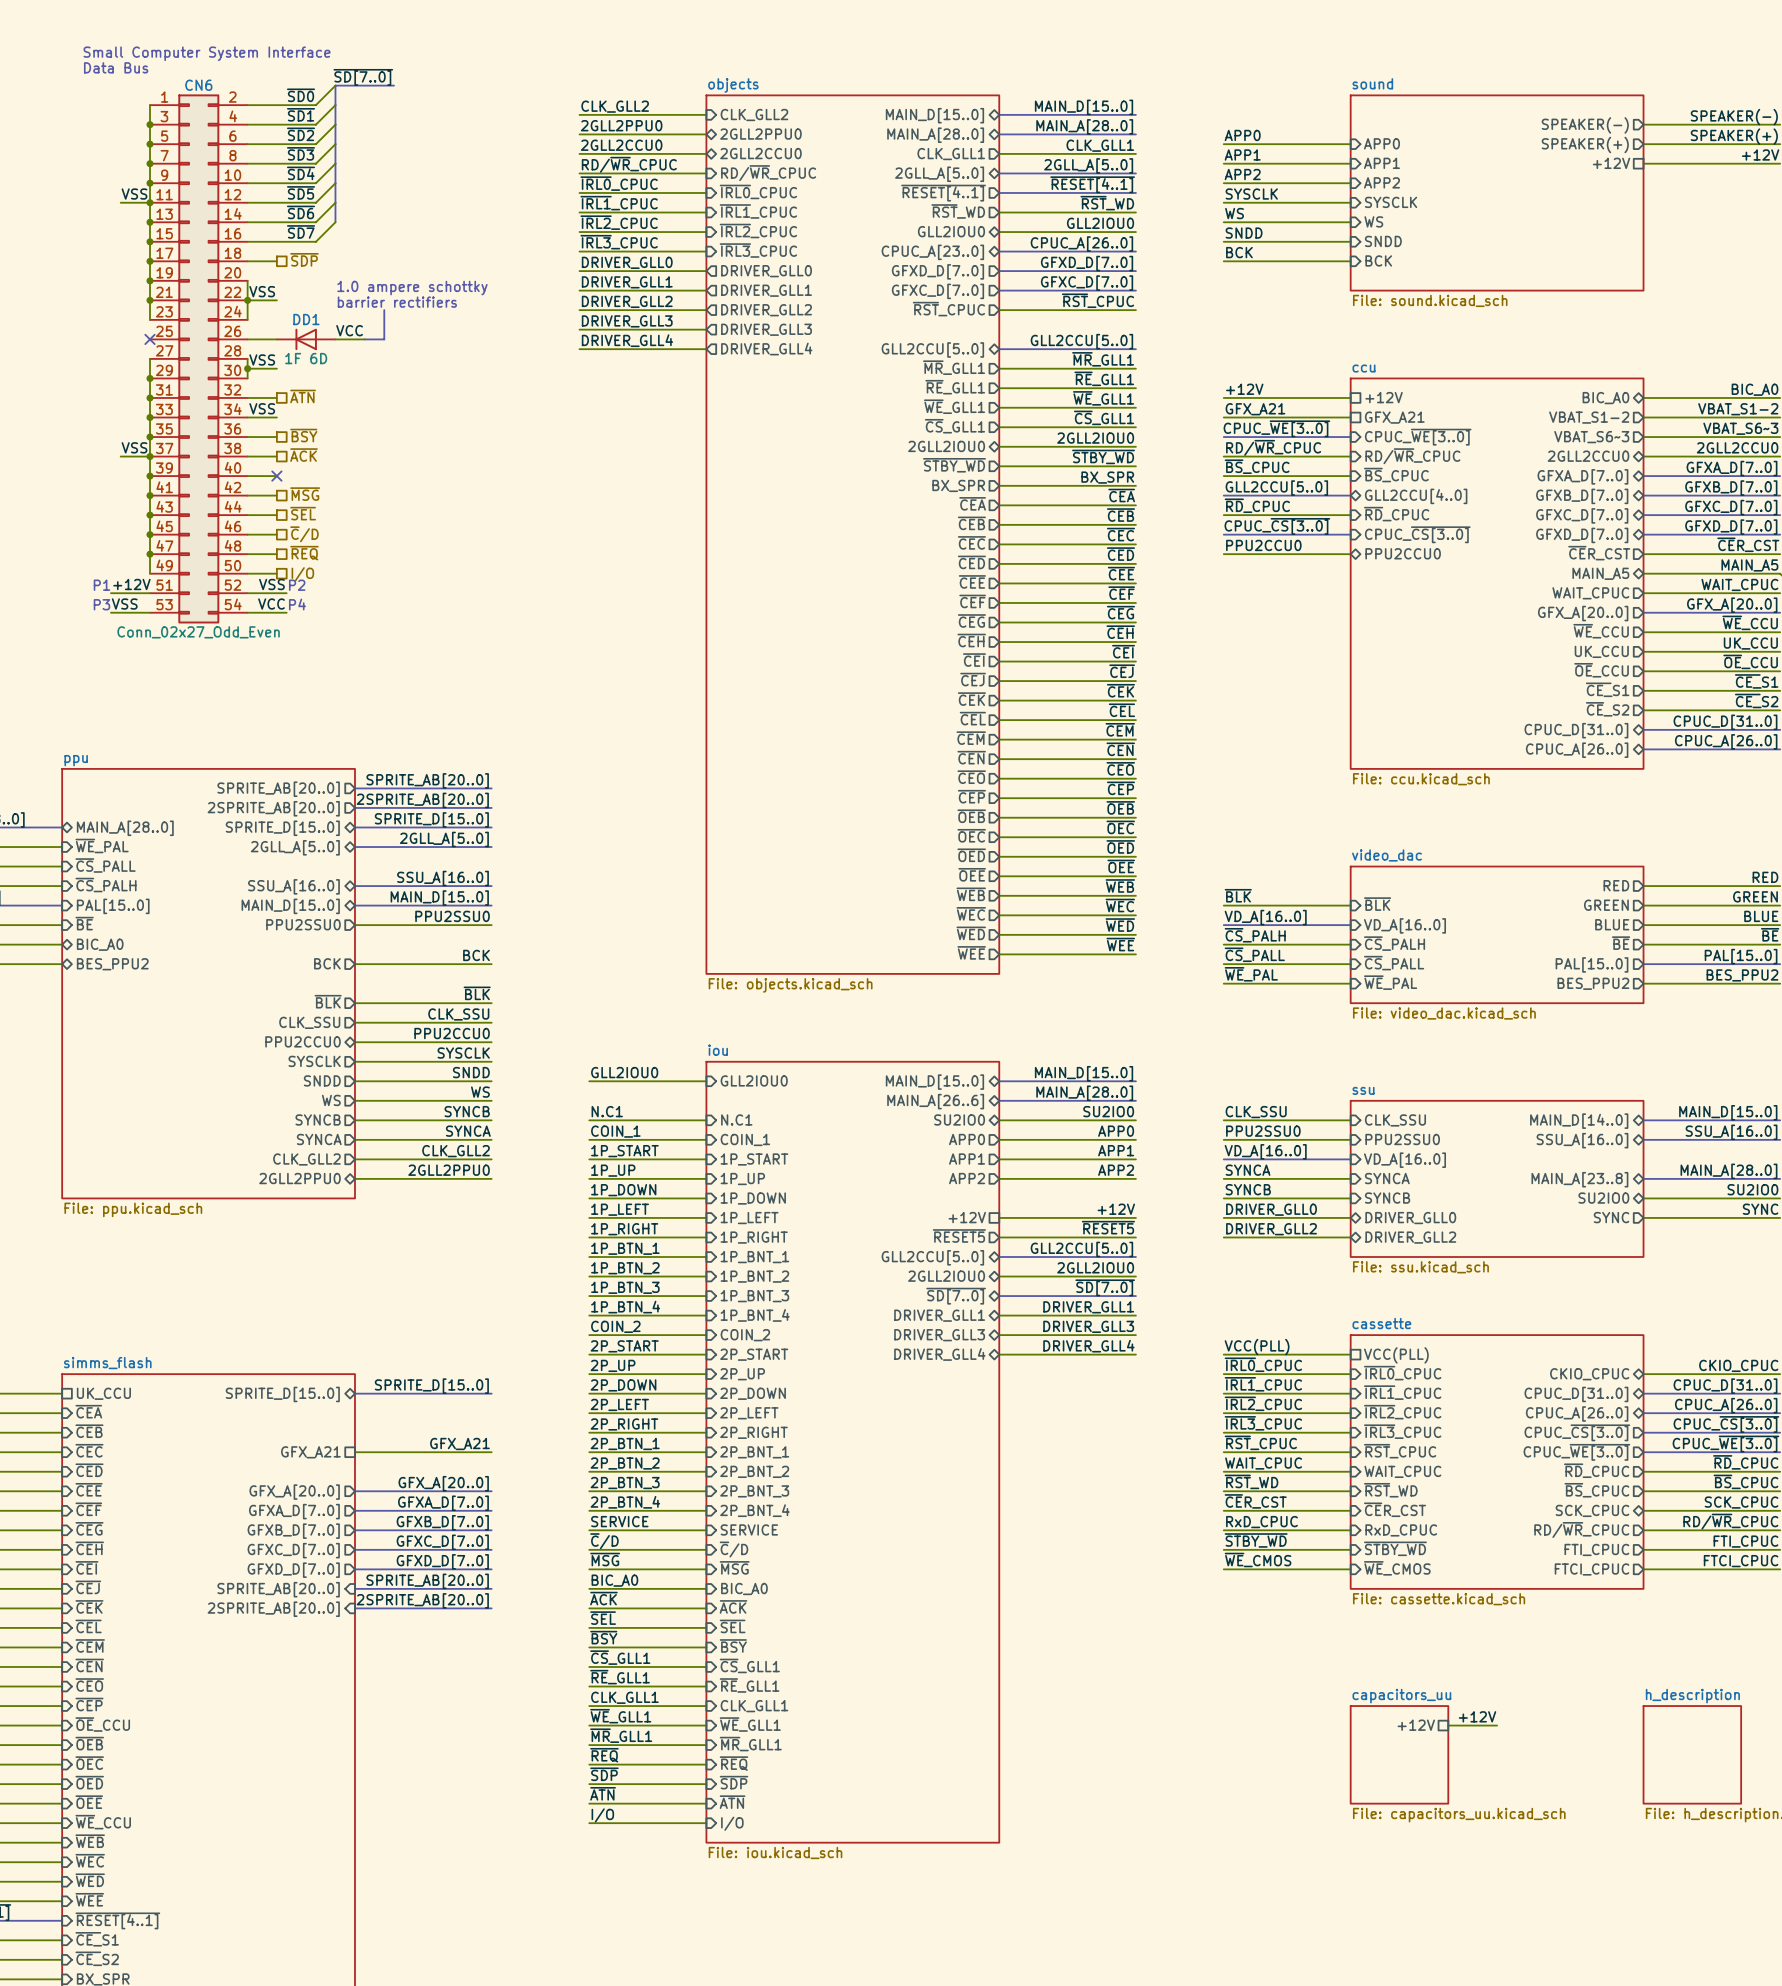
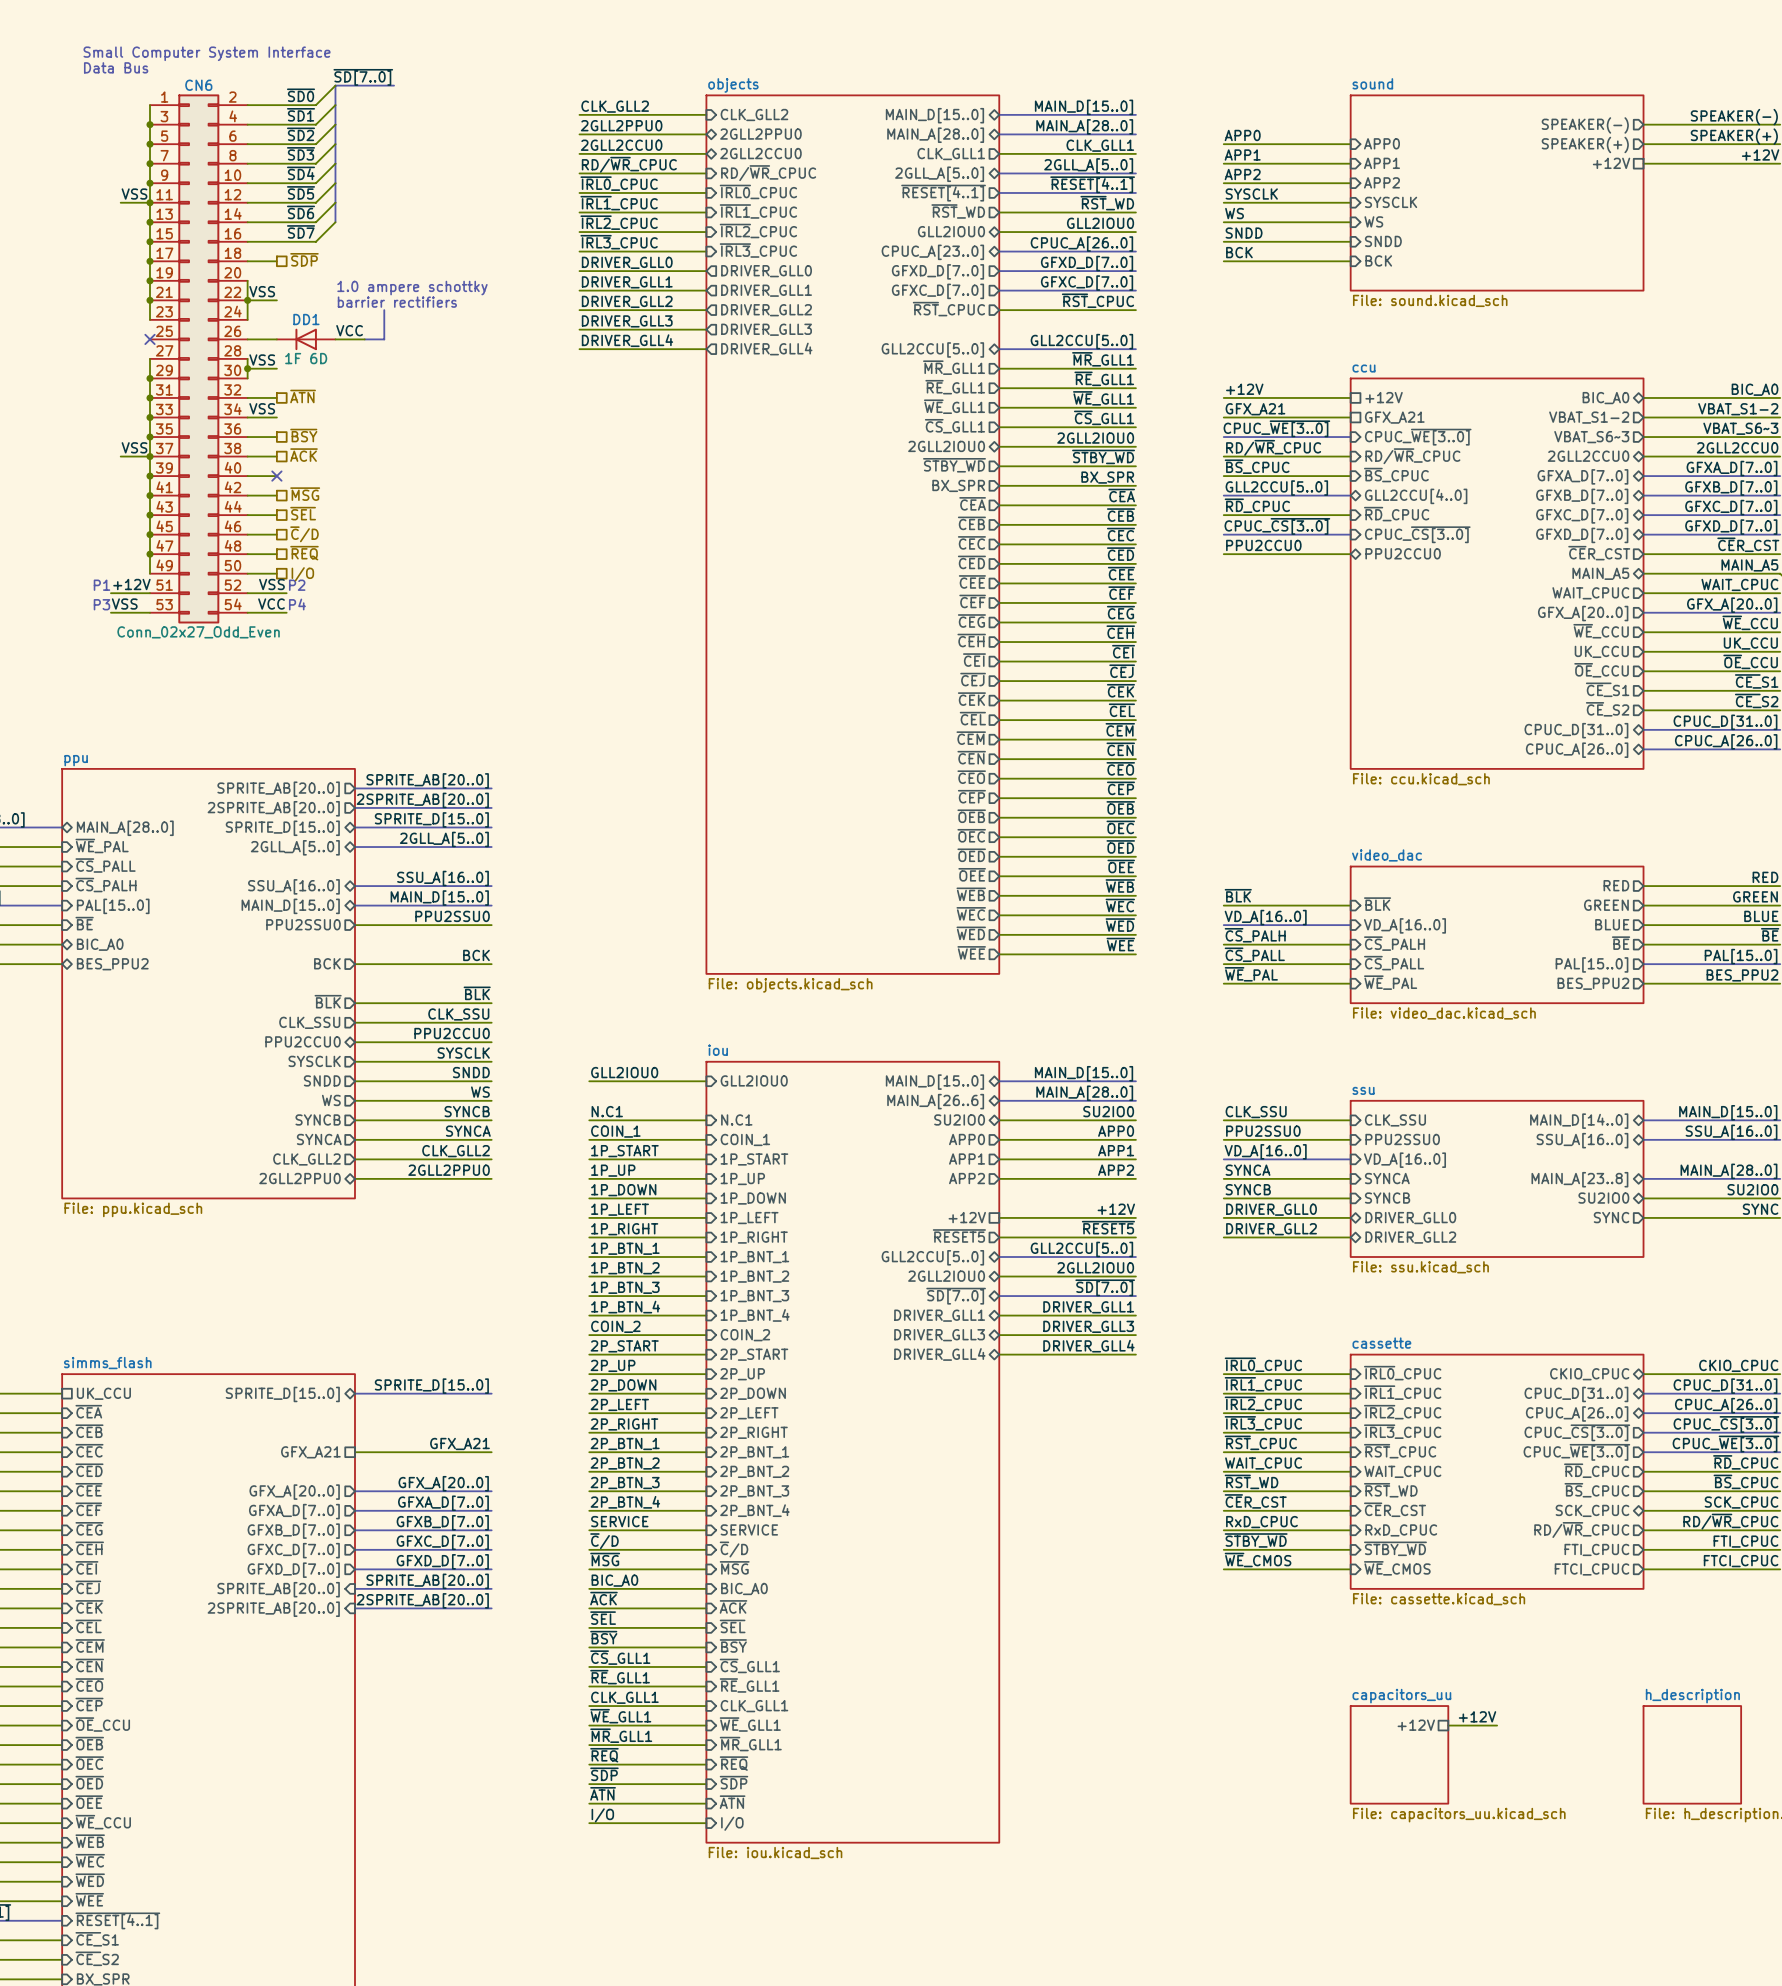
label: VCC(PLL) (1257, 1347) -> none
wire: (1223, 1354) (1350, 1354) -> none
sheet pin: VCC(PLL) (1396, 1355) -> none
sheet cassette: File: cassette.kicad_sch (1497, 1461) -> none
sheet cassette: none -> File: cassette.kicad_sch (1497, 1471)

